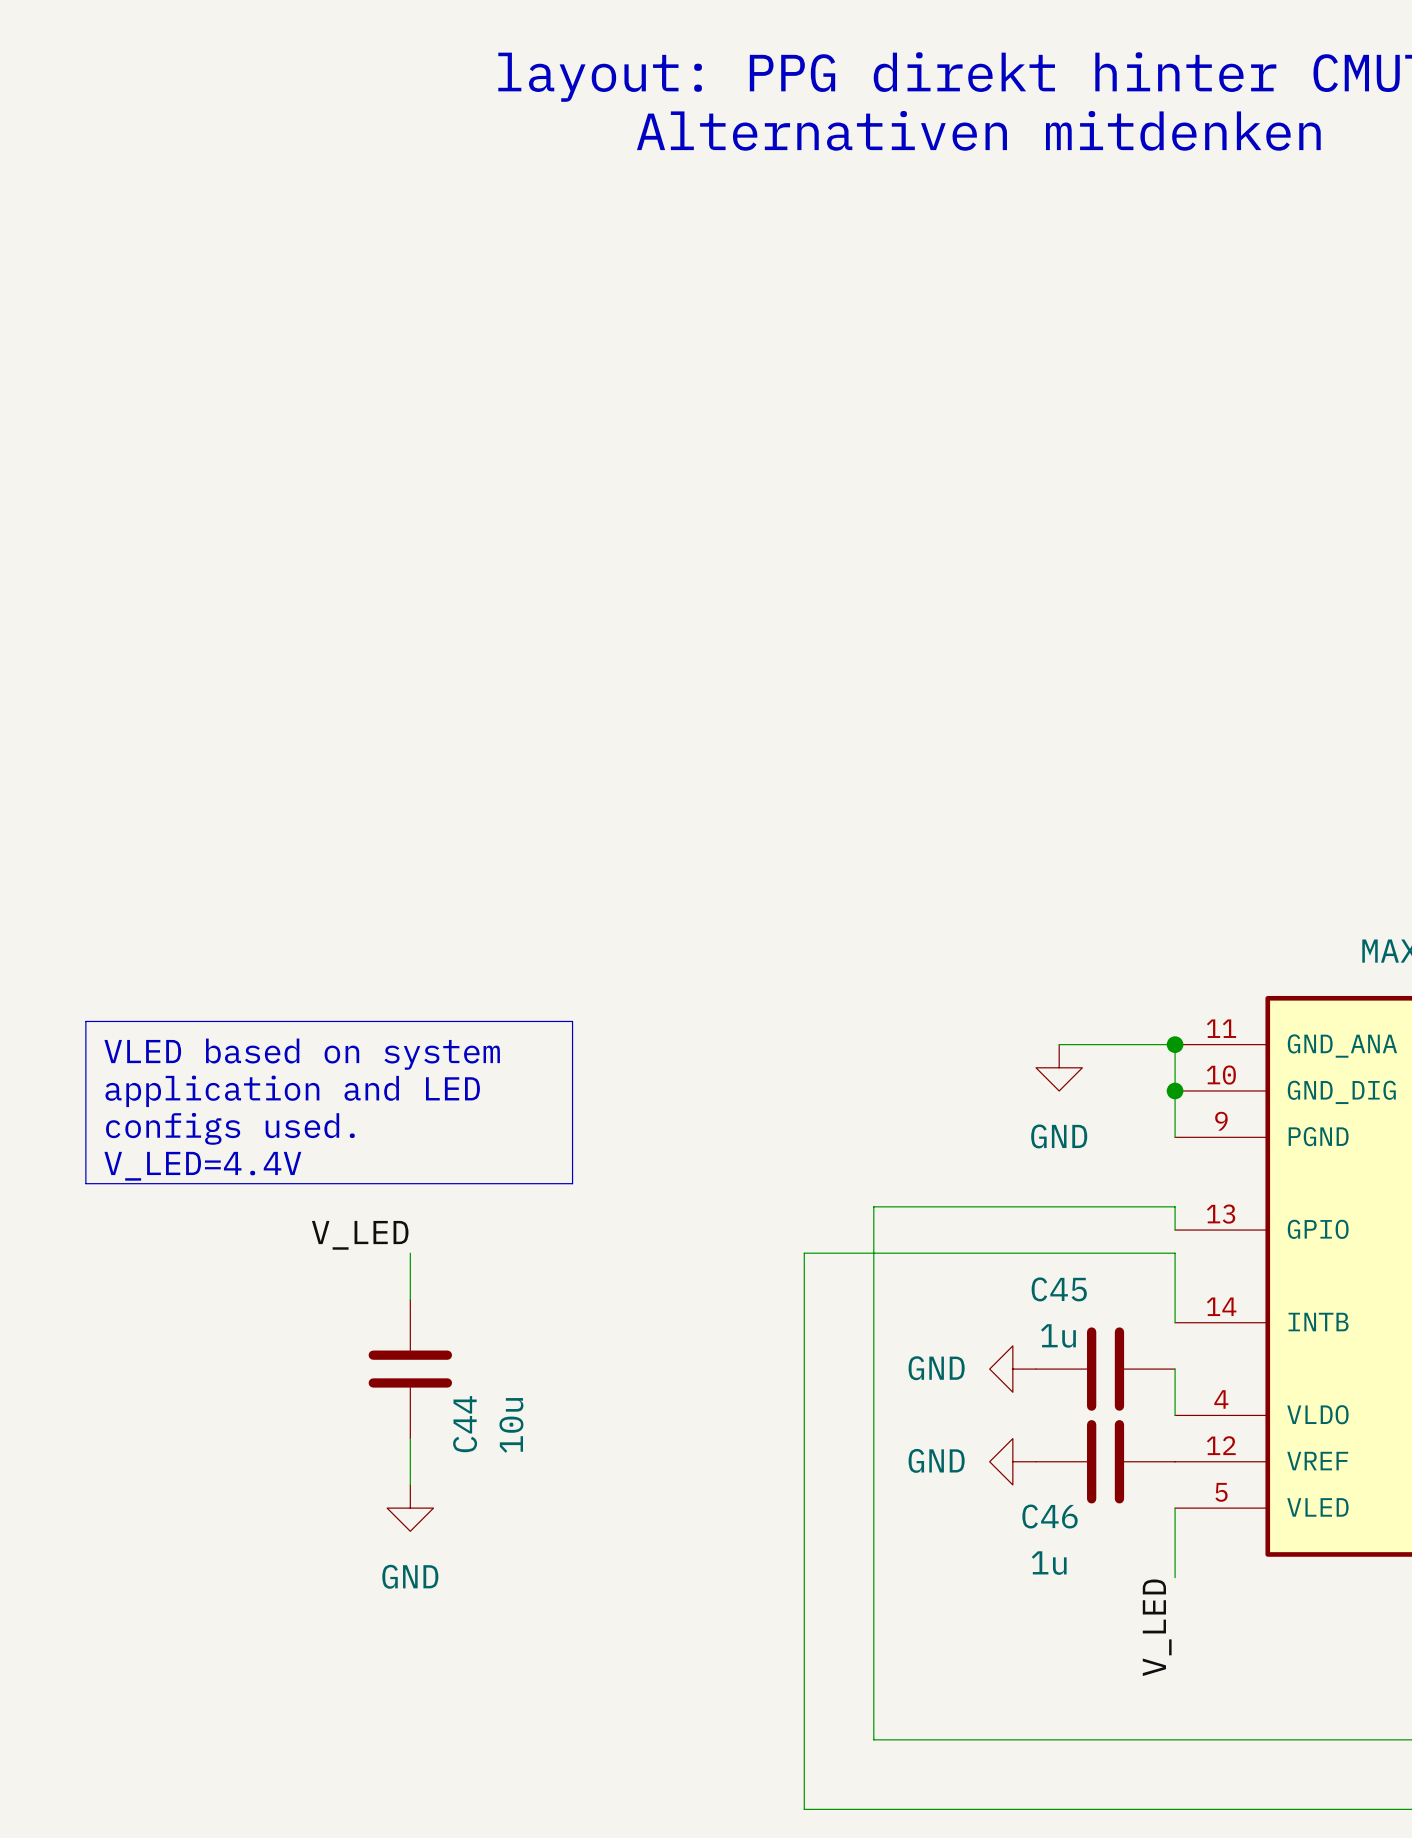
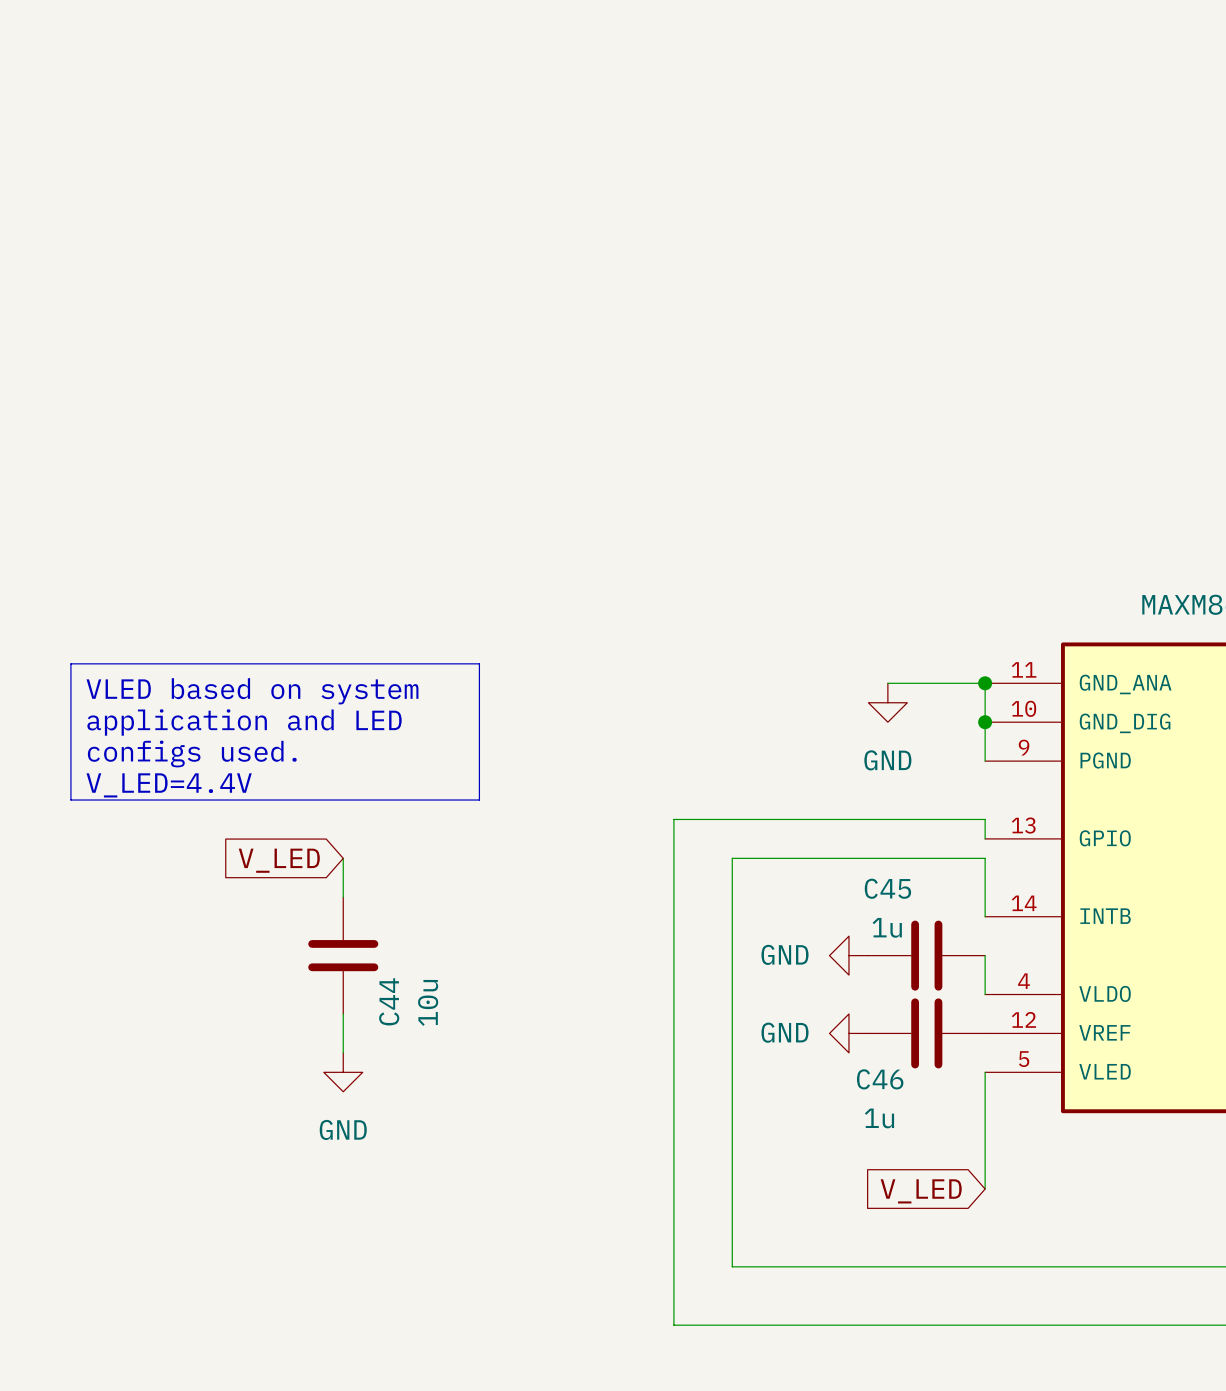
wire: (873, 1206) (873, 1253) (804, 1253) -> (732, 819) (673, 819) (673, 858)
label: V_LED (360, 1235) -> none
global label: none -> V_LED (279, 860)
wire: none -> (985, 1130) (985, 1189)
label: V_LED (1157, 1627) -> none
global label: none -> V_LED (921, 1191)

